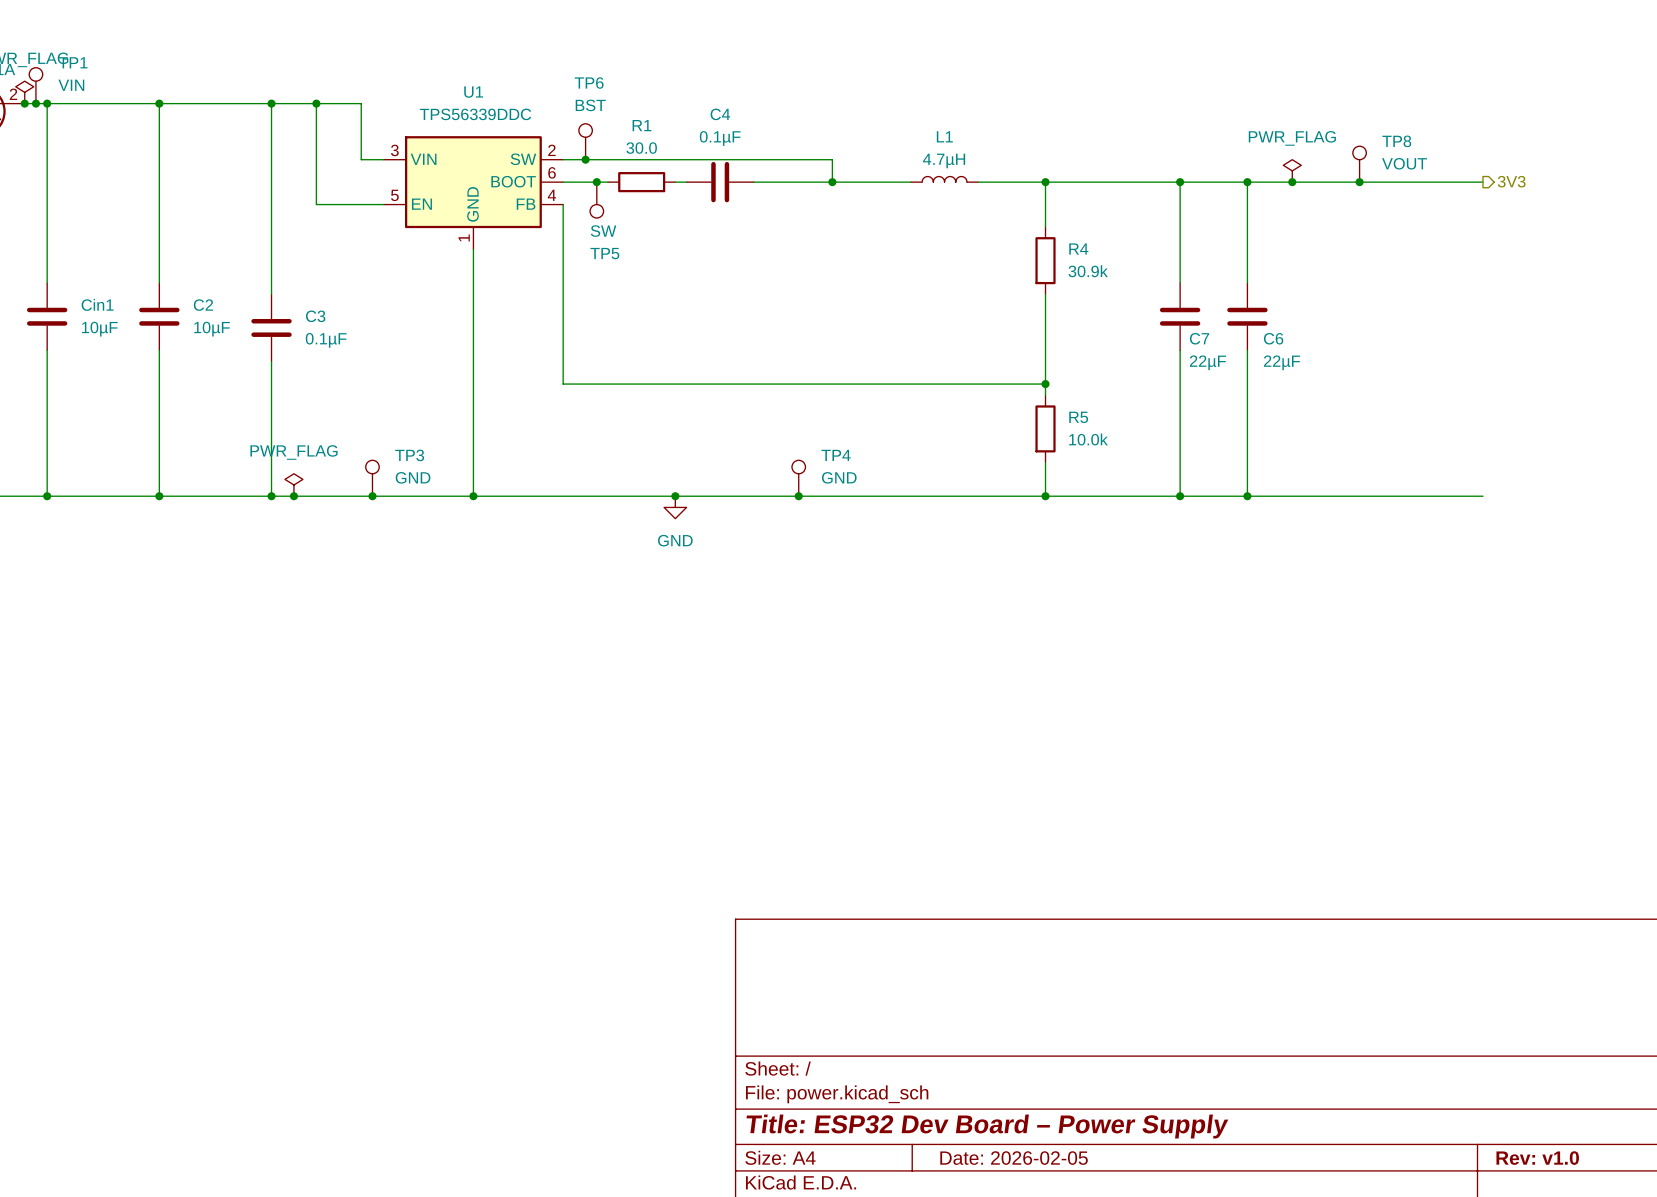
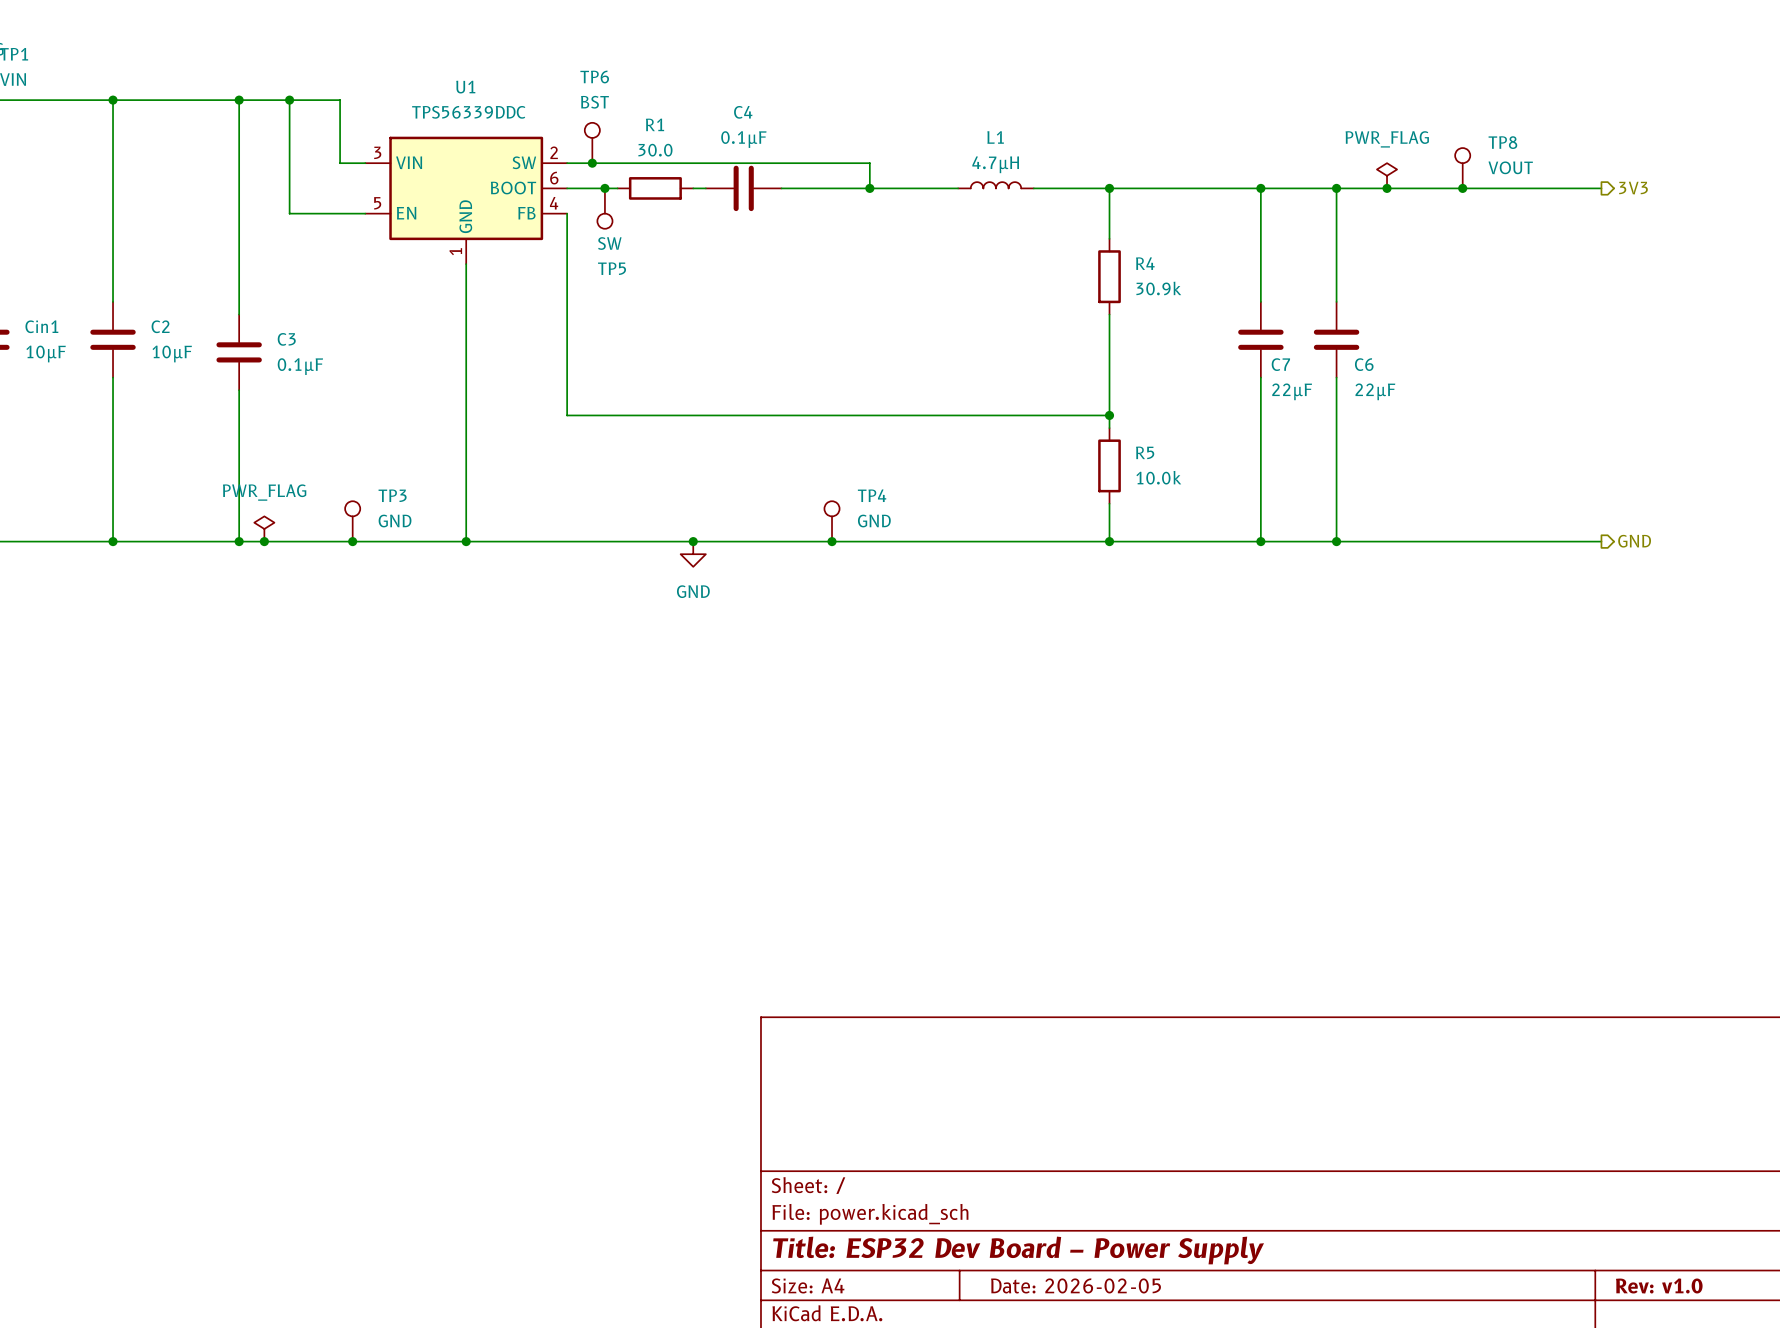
hierarchical label: none -> GND (1634, 541)

